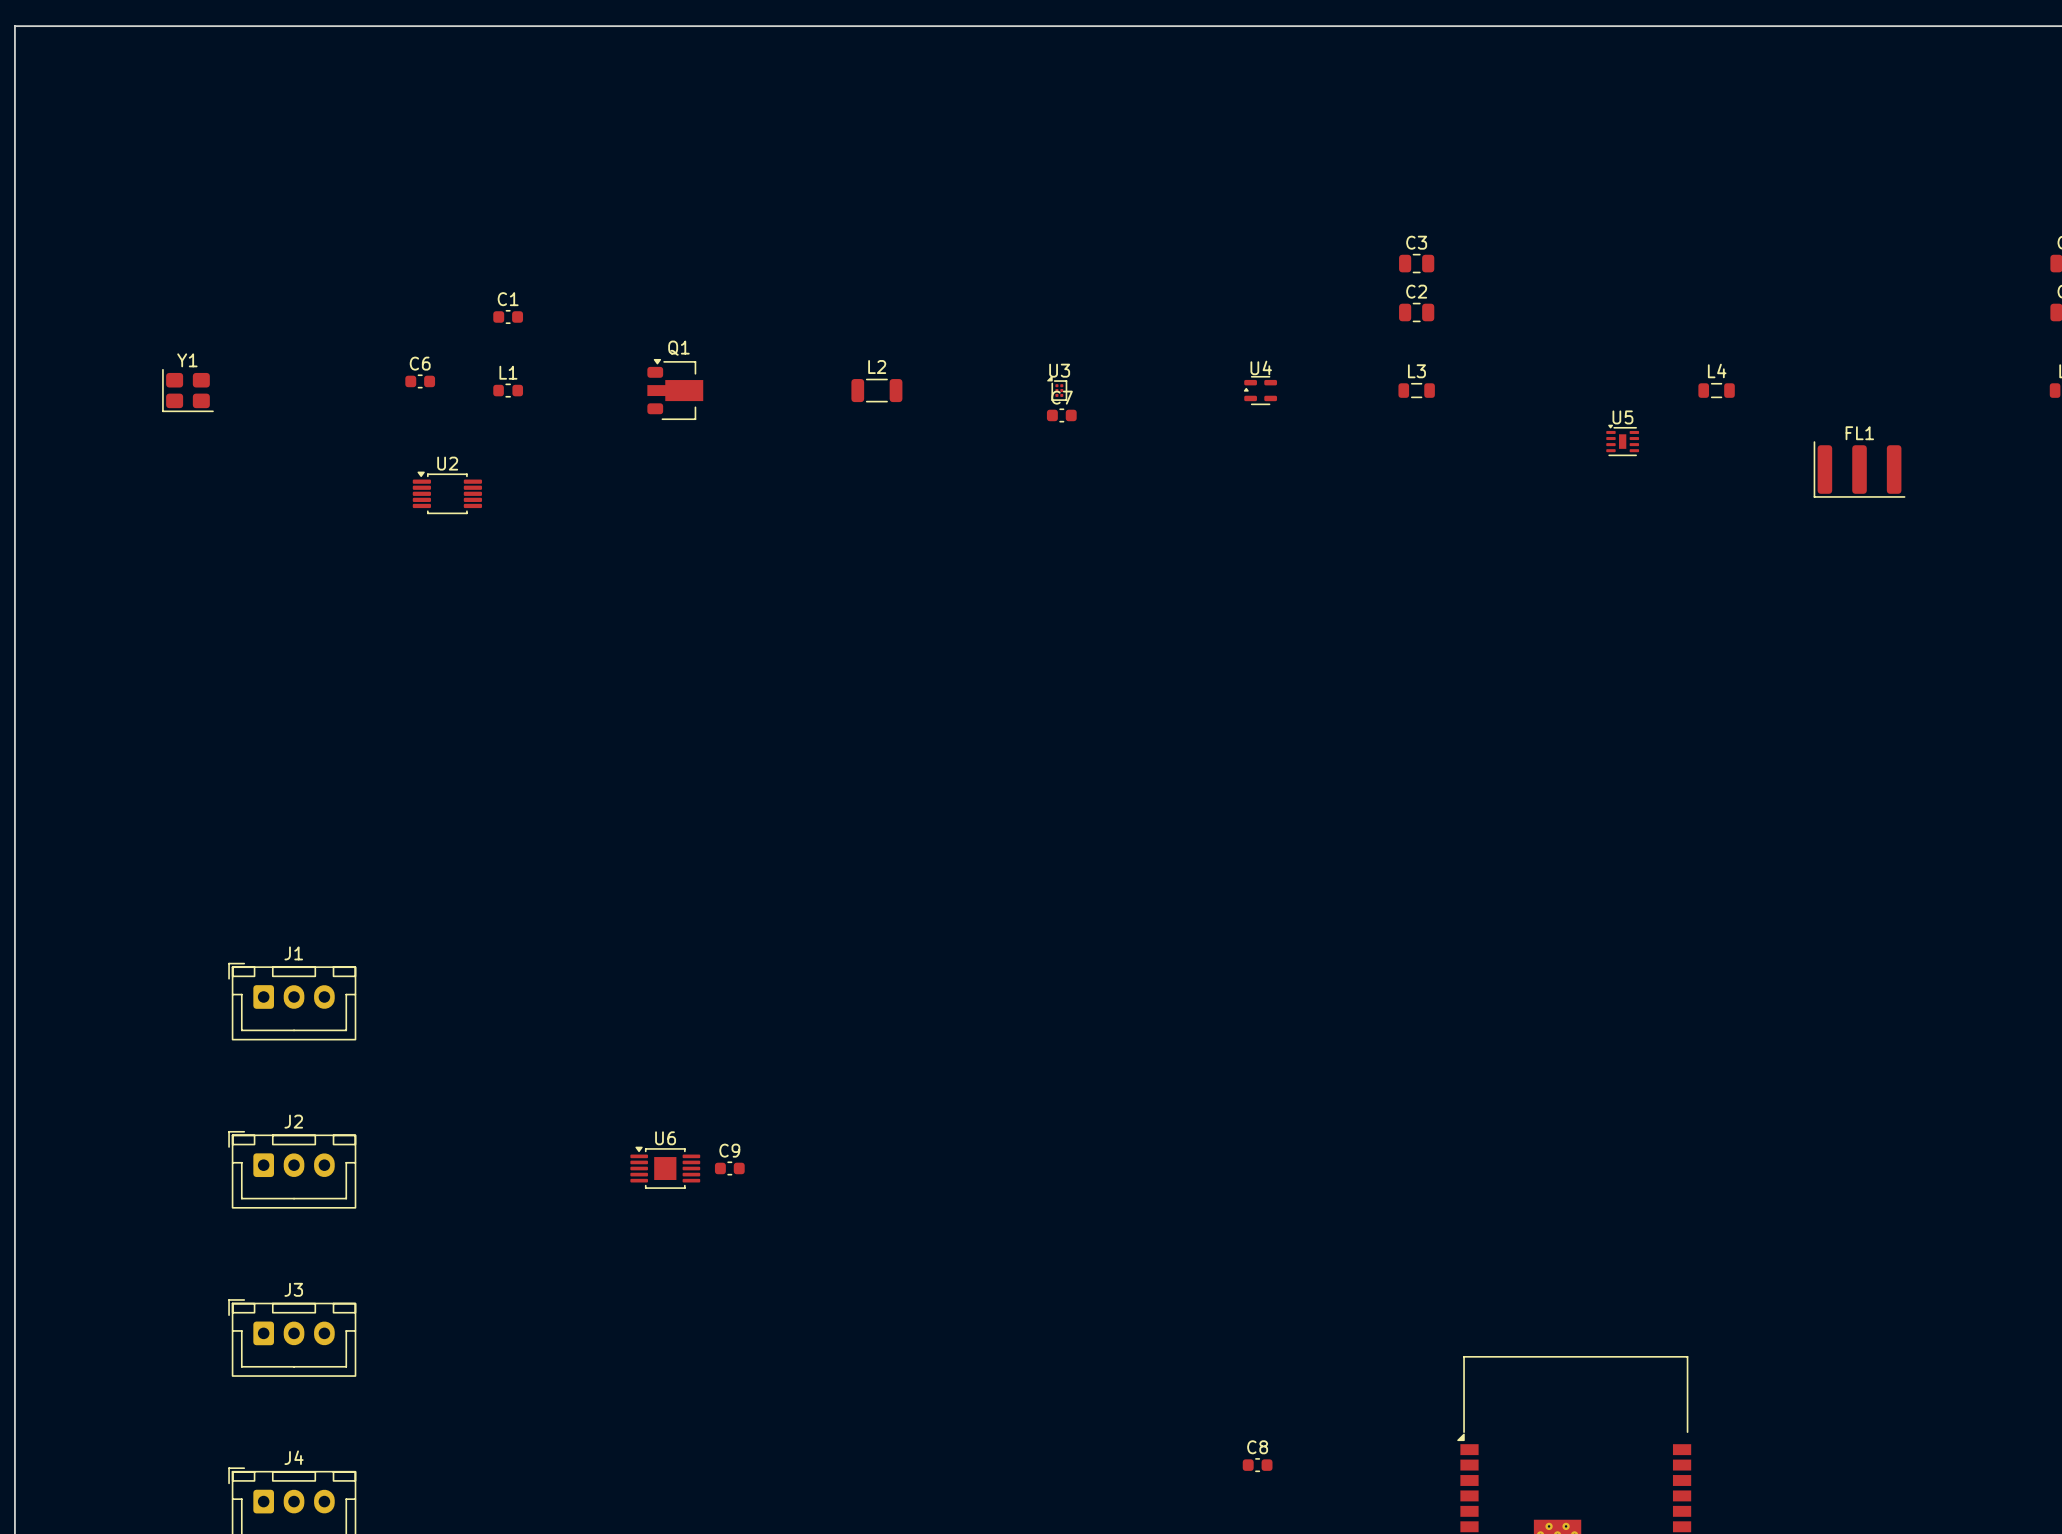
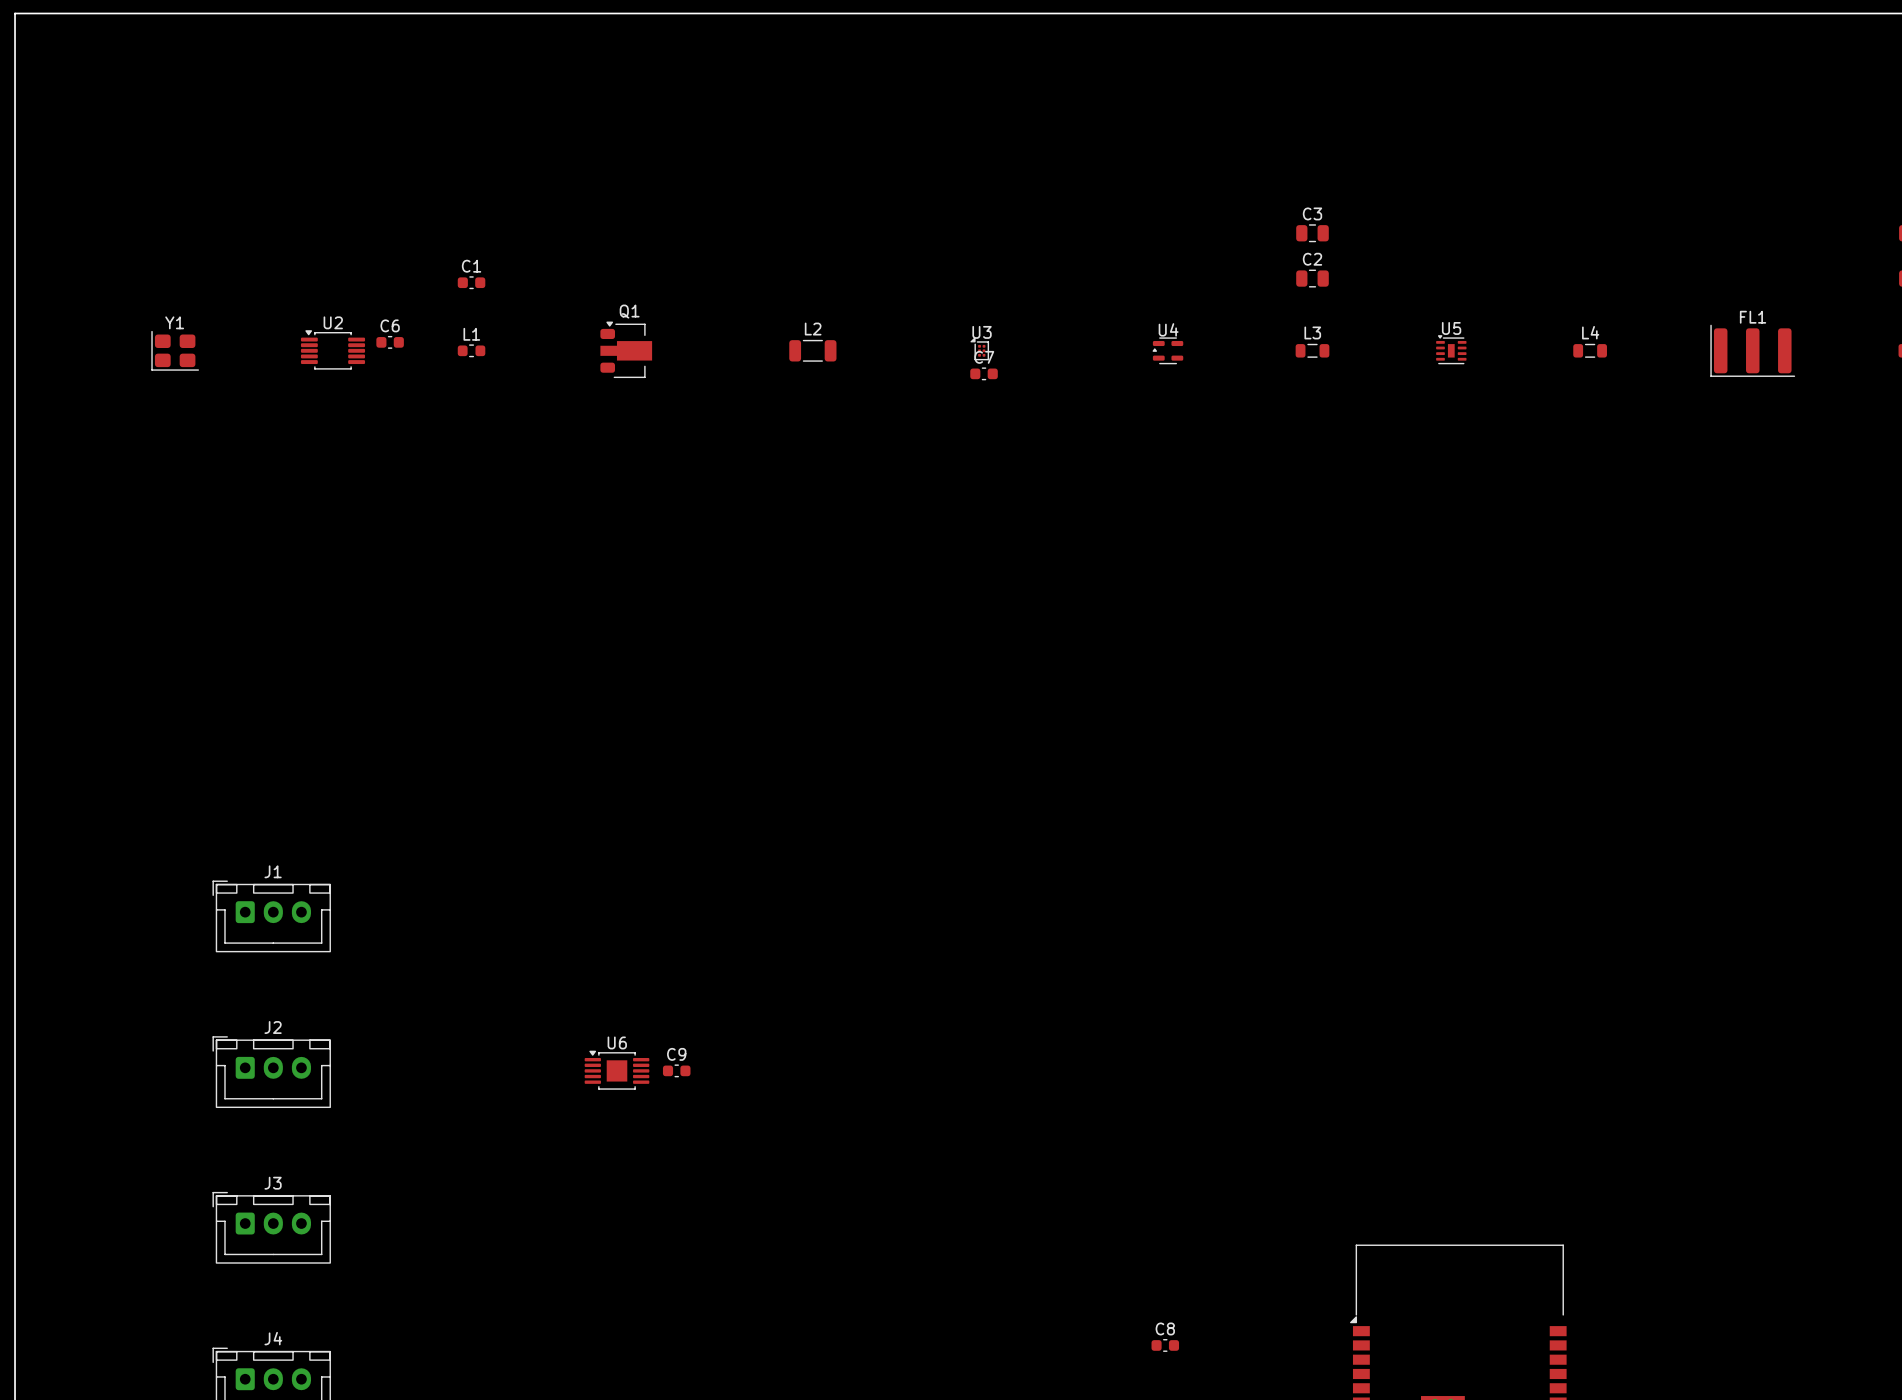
U5 position: (1622, 440) -> (1451, 349)
FL1 position: (1859, 469) -> (1752, 350)
U2 position: (447, 492) -> (332, 349)

